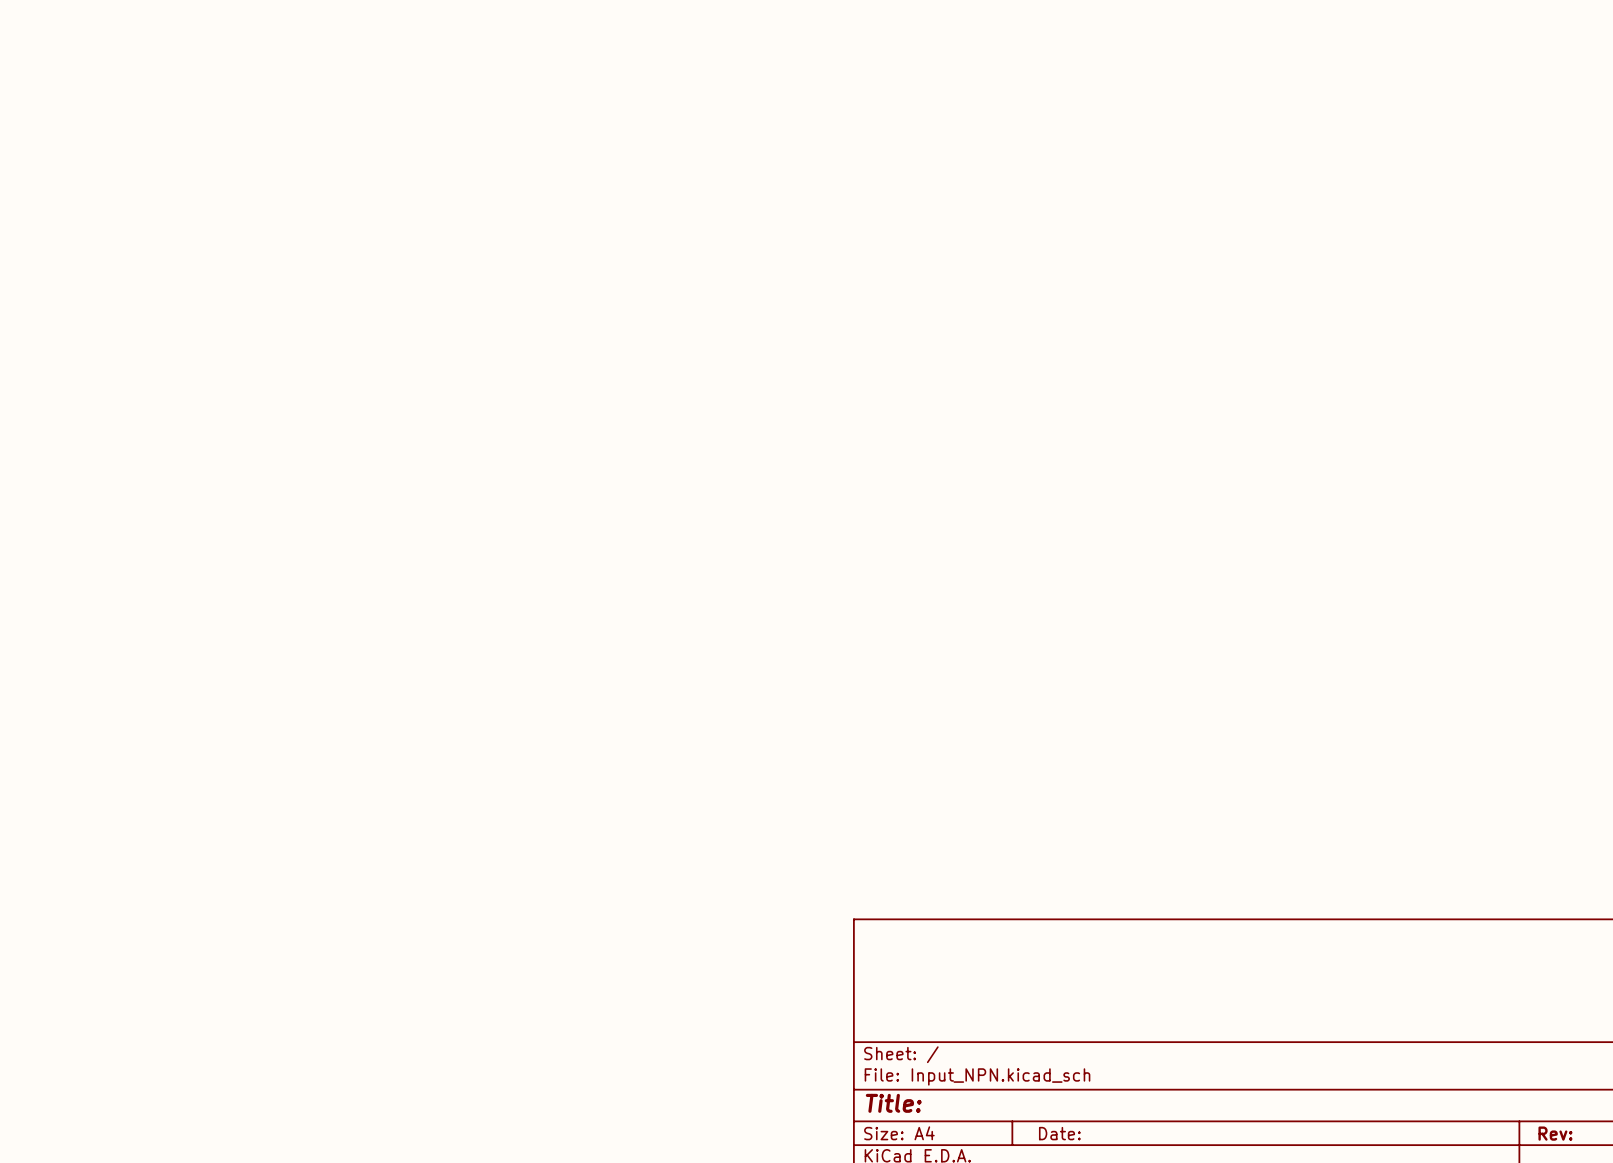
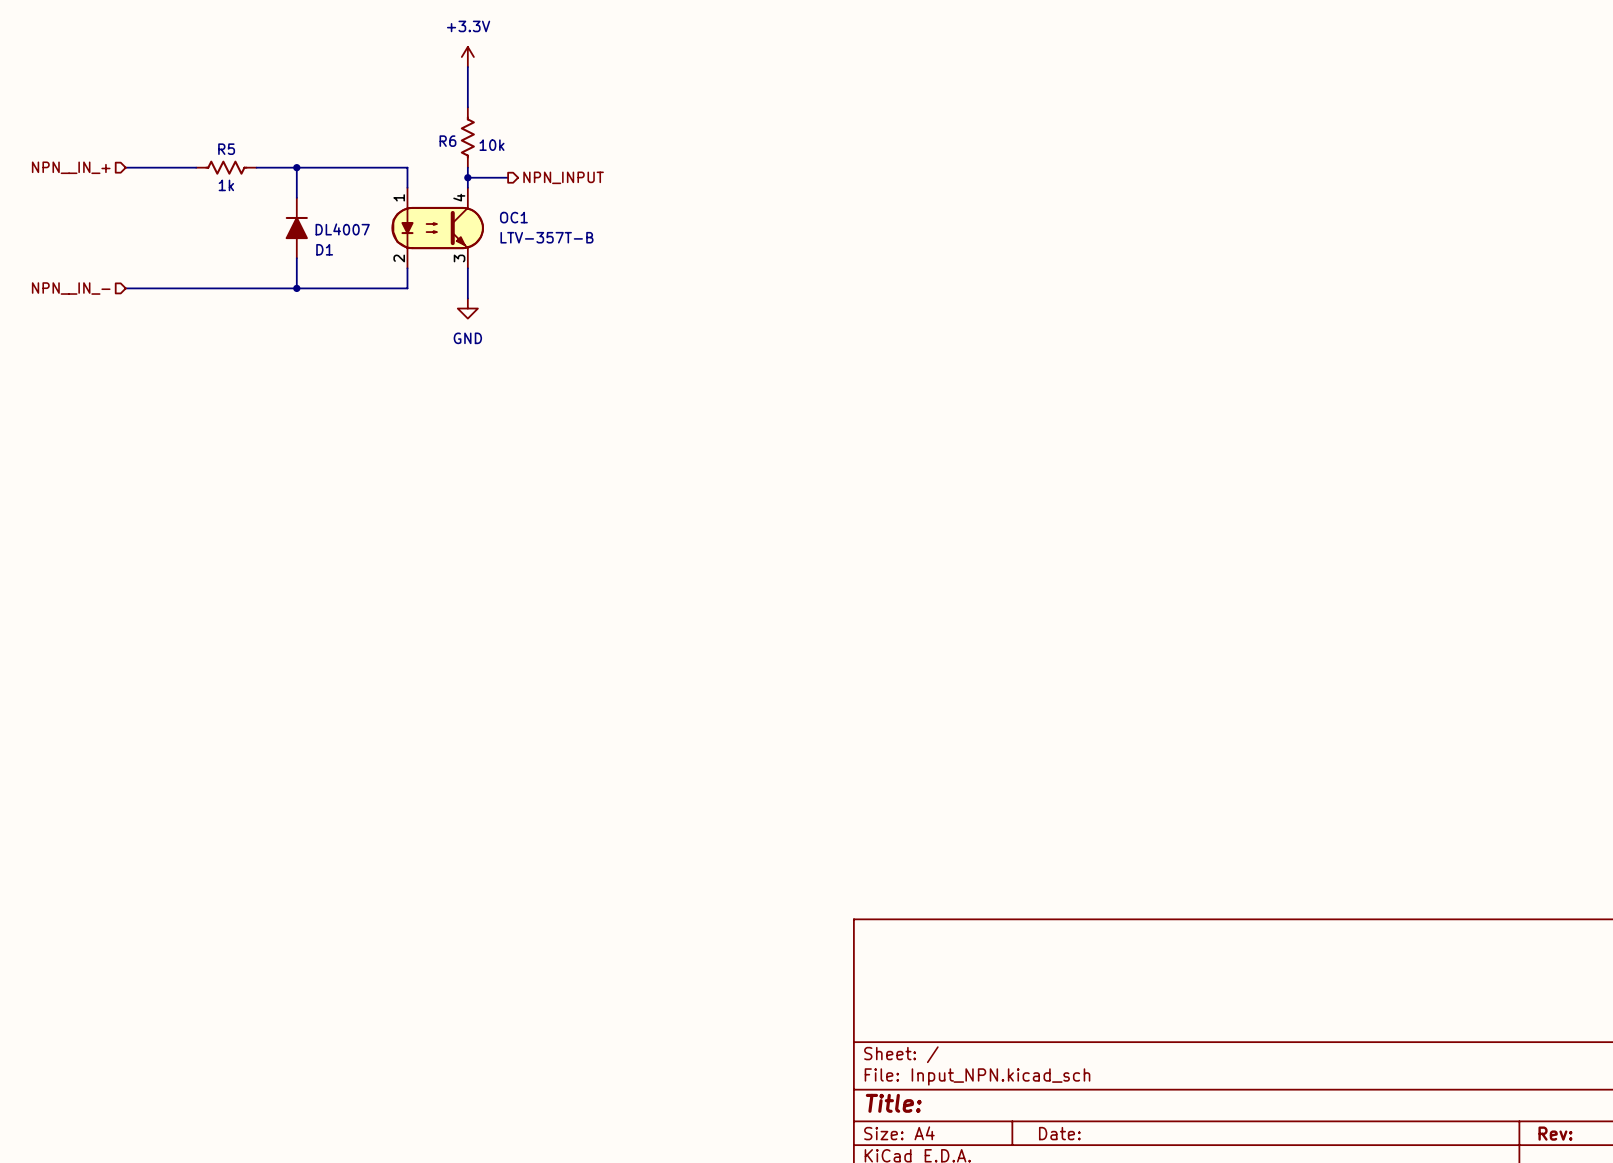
power symbol: none -> +3.3V (467, 56)
wire: none -> (467, 67) (467, 107)
R6: none -> (467, 137)
hierarchical label: none -> NPN__IN_+ (71, 167)
wire: none -> (125, 167) (196, 167)
R5: none -> (226, 167)
wire: none -> (256, 167) (407, 167) (407, 187)
wire: none -> (296, 167) (296, 197)
junction: none -> (296, 167)
wire: none -> (467, 167) (467, 187)
wire: none -> (467, 177) (508, 177)
junction: none -> (467, 177)
hierarchical label: none -> NPN_INPUT (563, 177)
D1: none -> DL4007 (296, 228)
OC1: none -> LTV-357T-B (437, 228)
wire: none -> (296, 258) (296, 288)
wire: none -> (407, 268) (407, 288) (125, 288)
wire: none -> (467, 268) (467, 298)
hierarchical label: none -> NPN__IN_- (71, 288)
junction: none -> (296, 288)
power symbol: none -> GND (467, 308)

